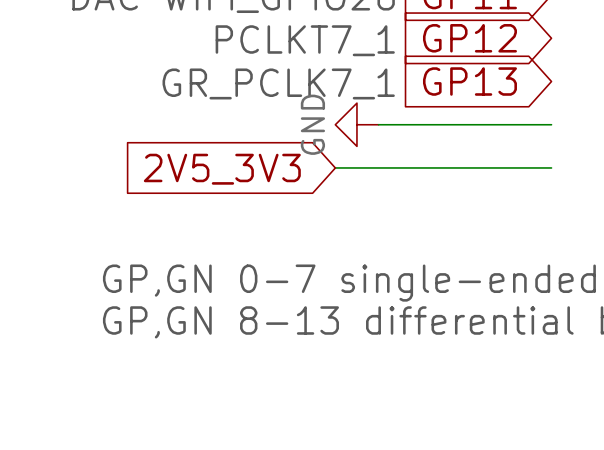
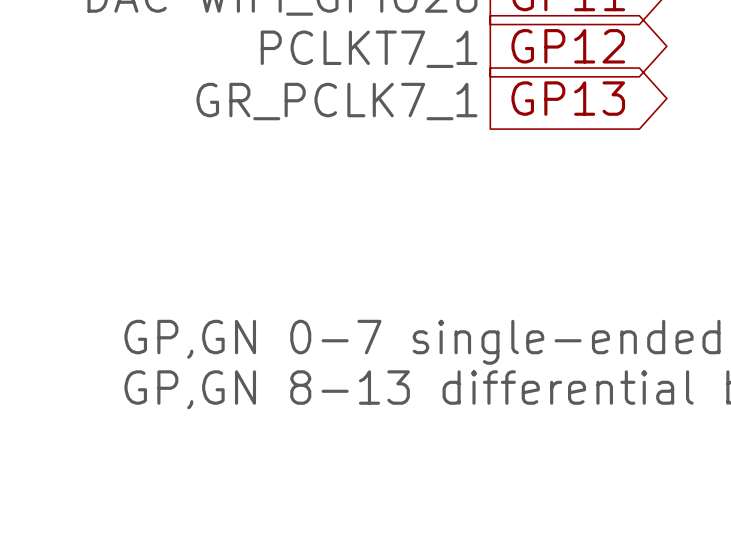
power symbol: GND (356, 124) -> none
wire: (378, 124) (551, 124) -> none
wire: (335, 167) (551, 167) -> none
global label: 2V5_3V3 (222, 169) -> none

